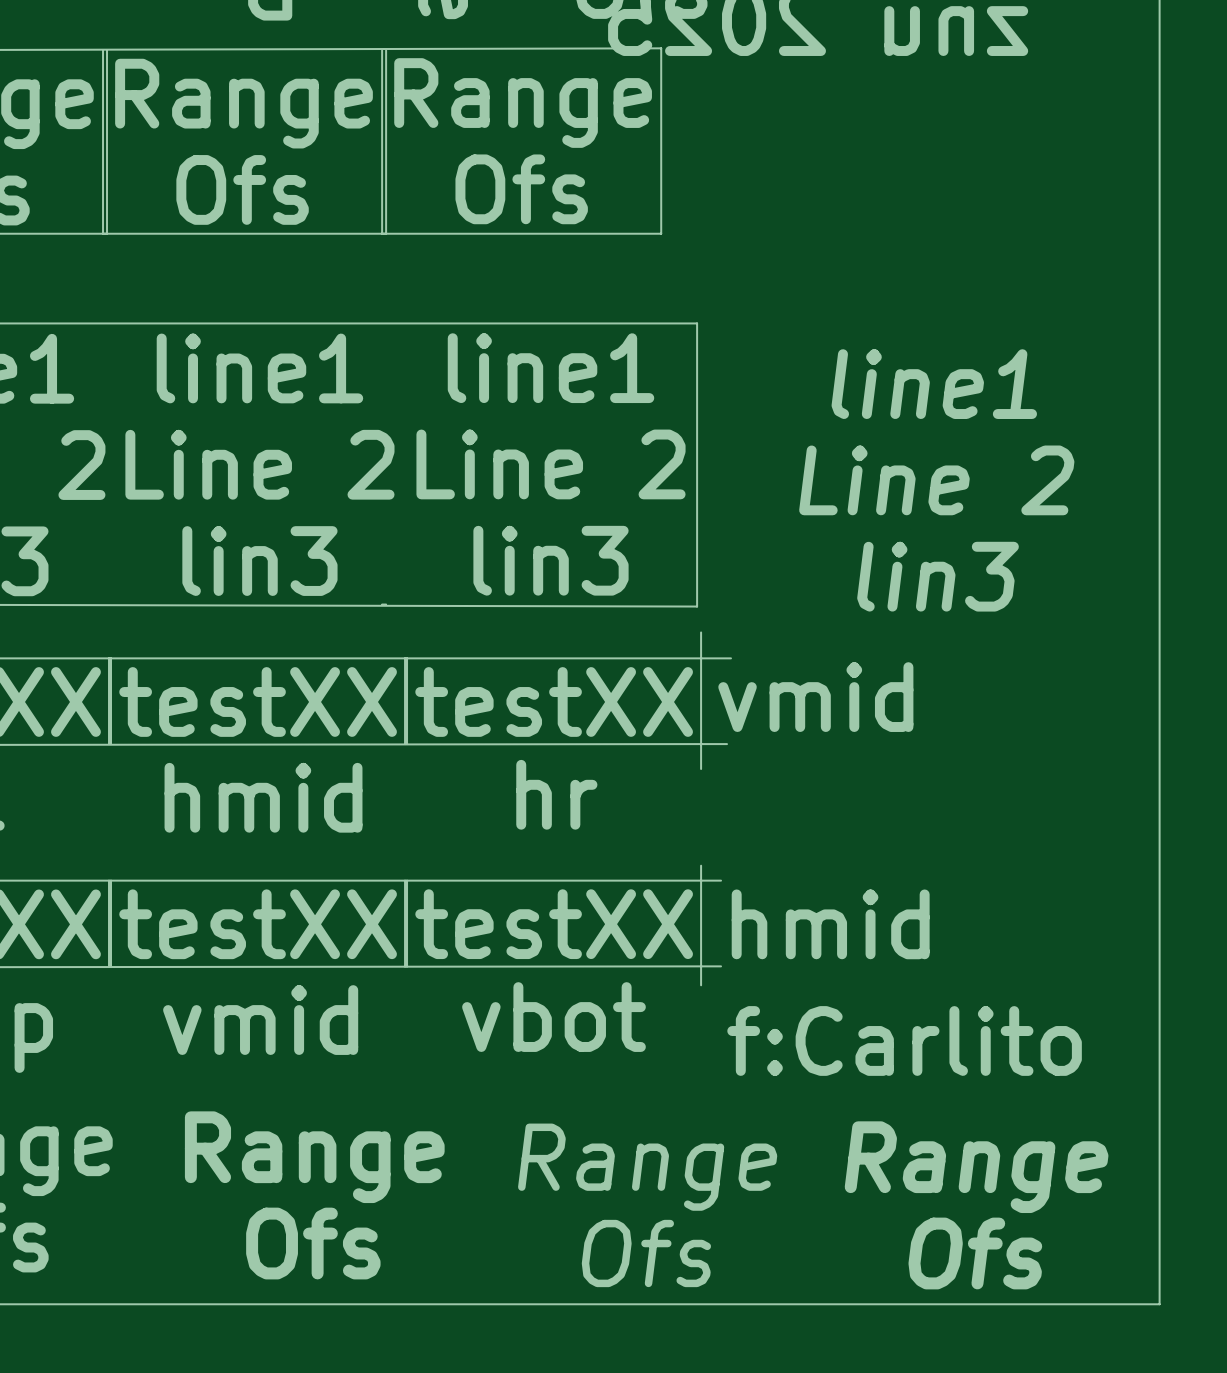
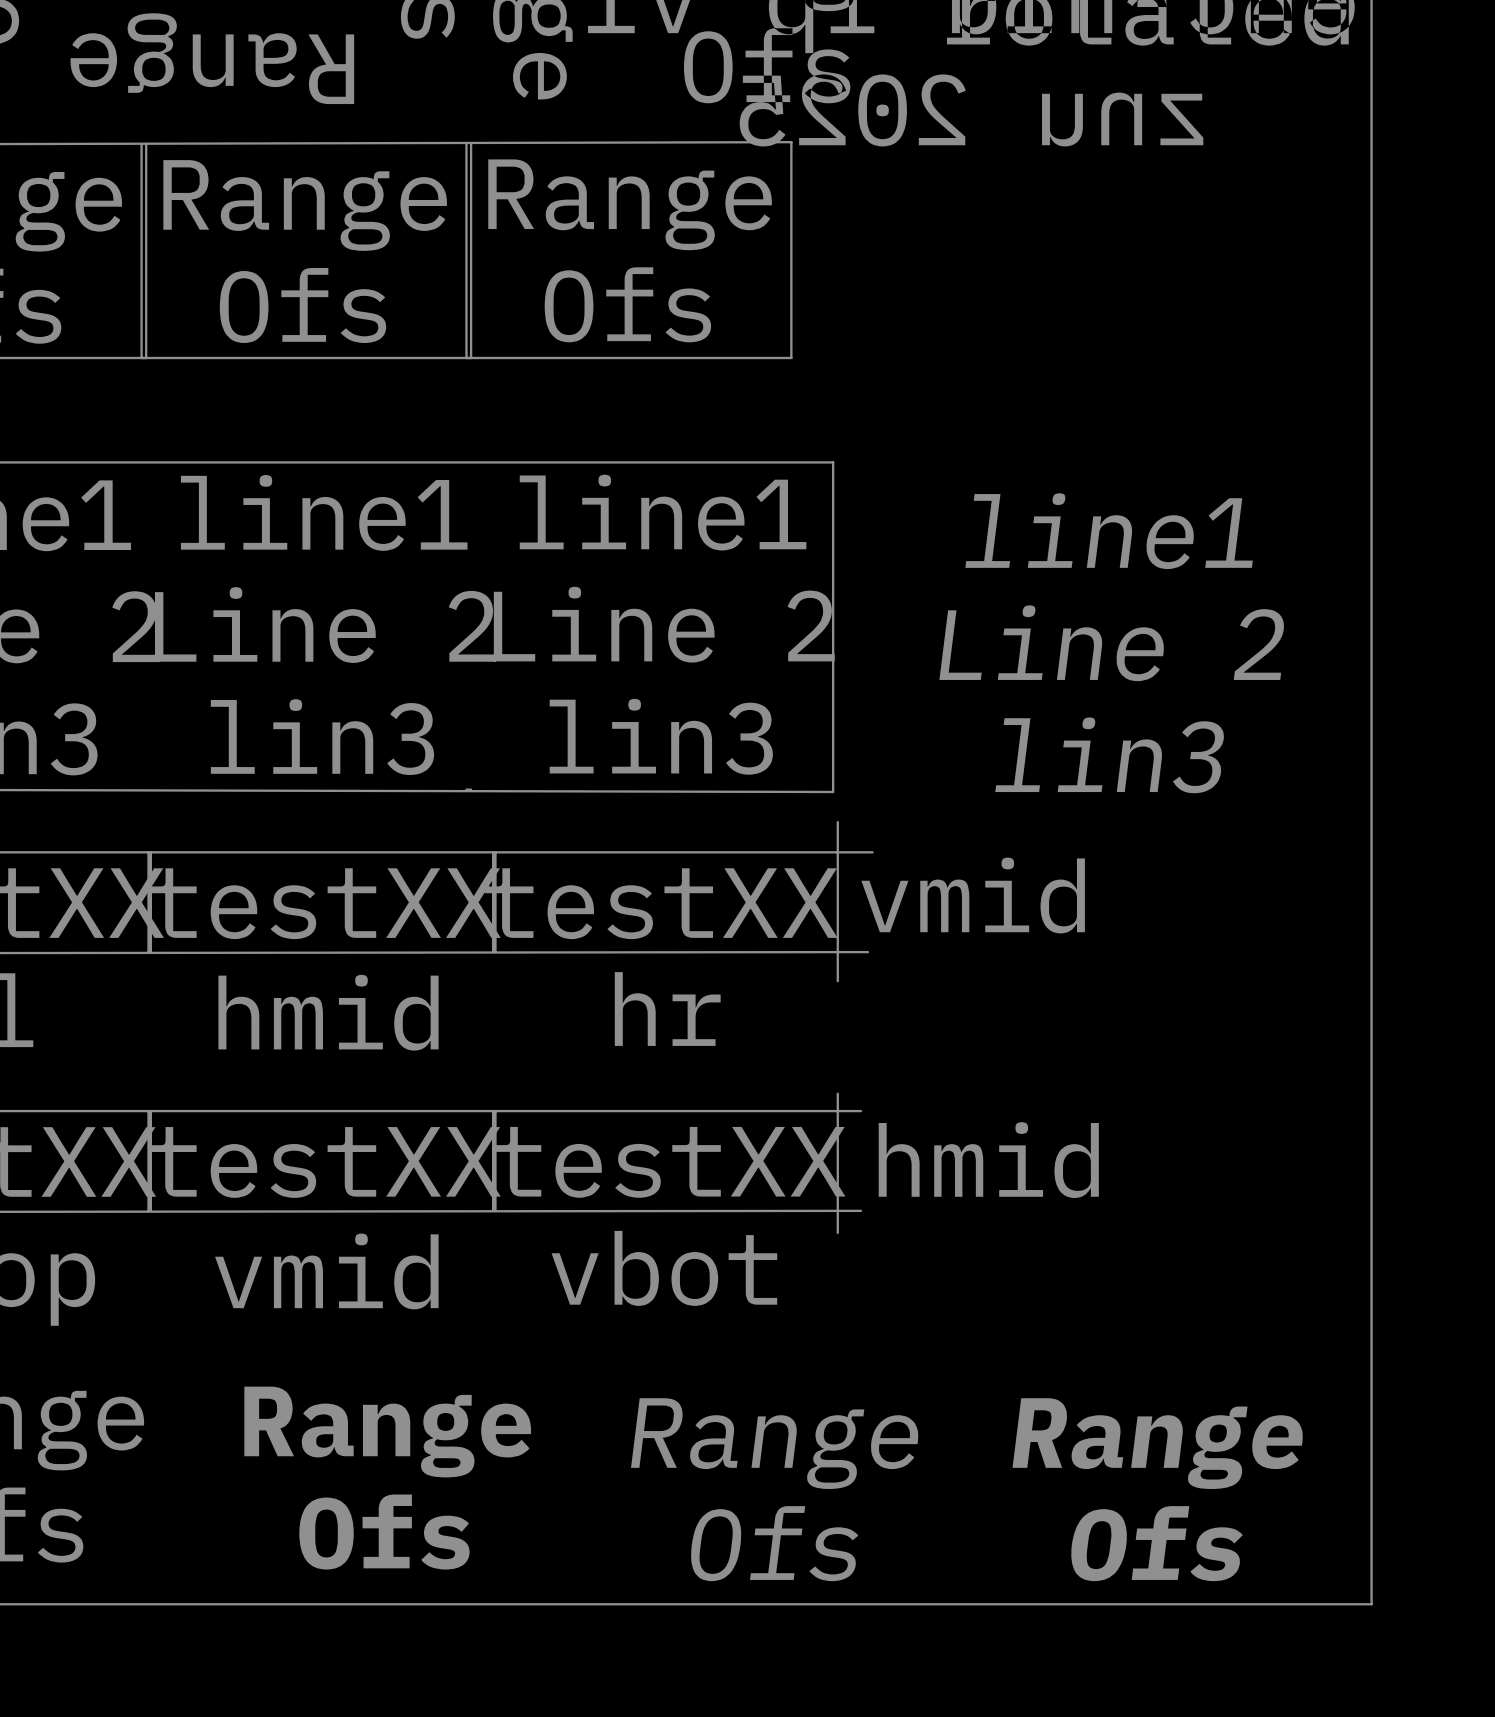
text: f:Carlito (904, 1040) -> none

